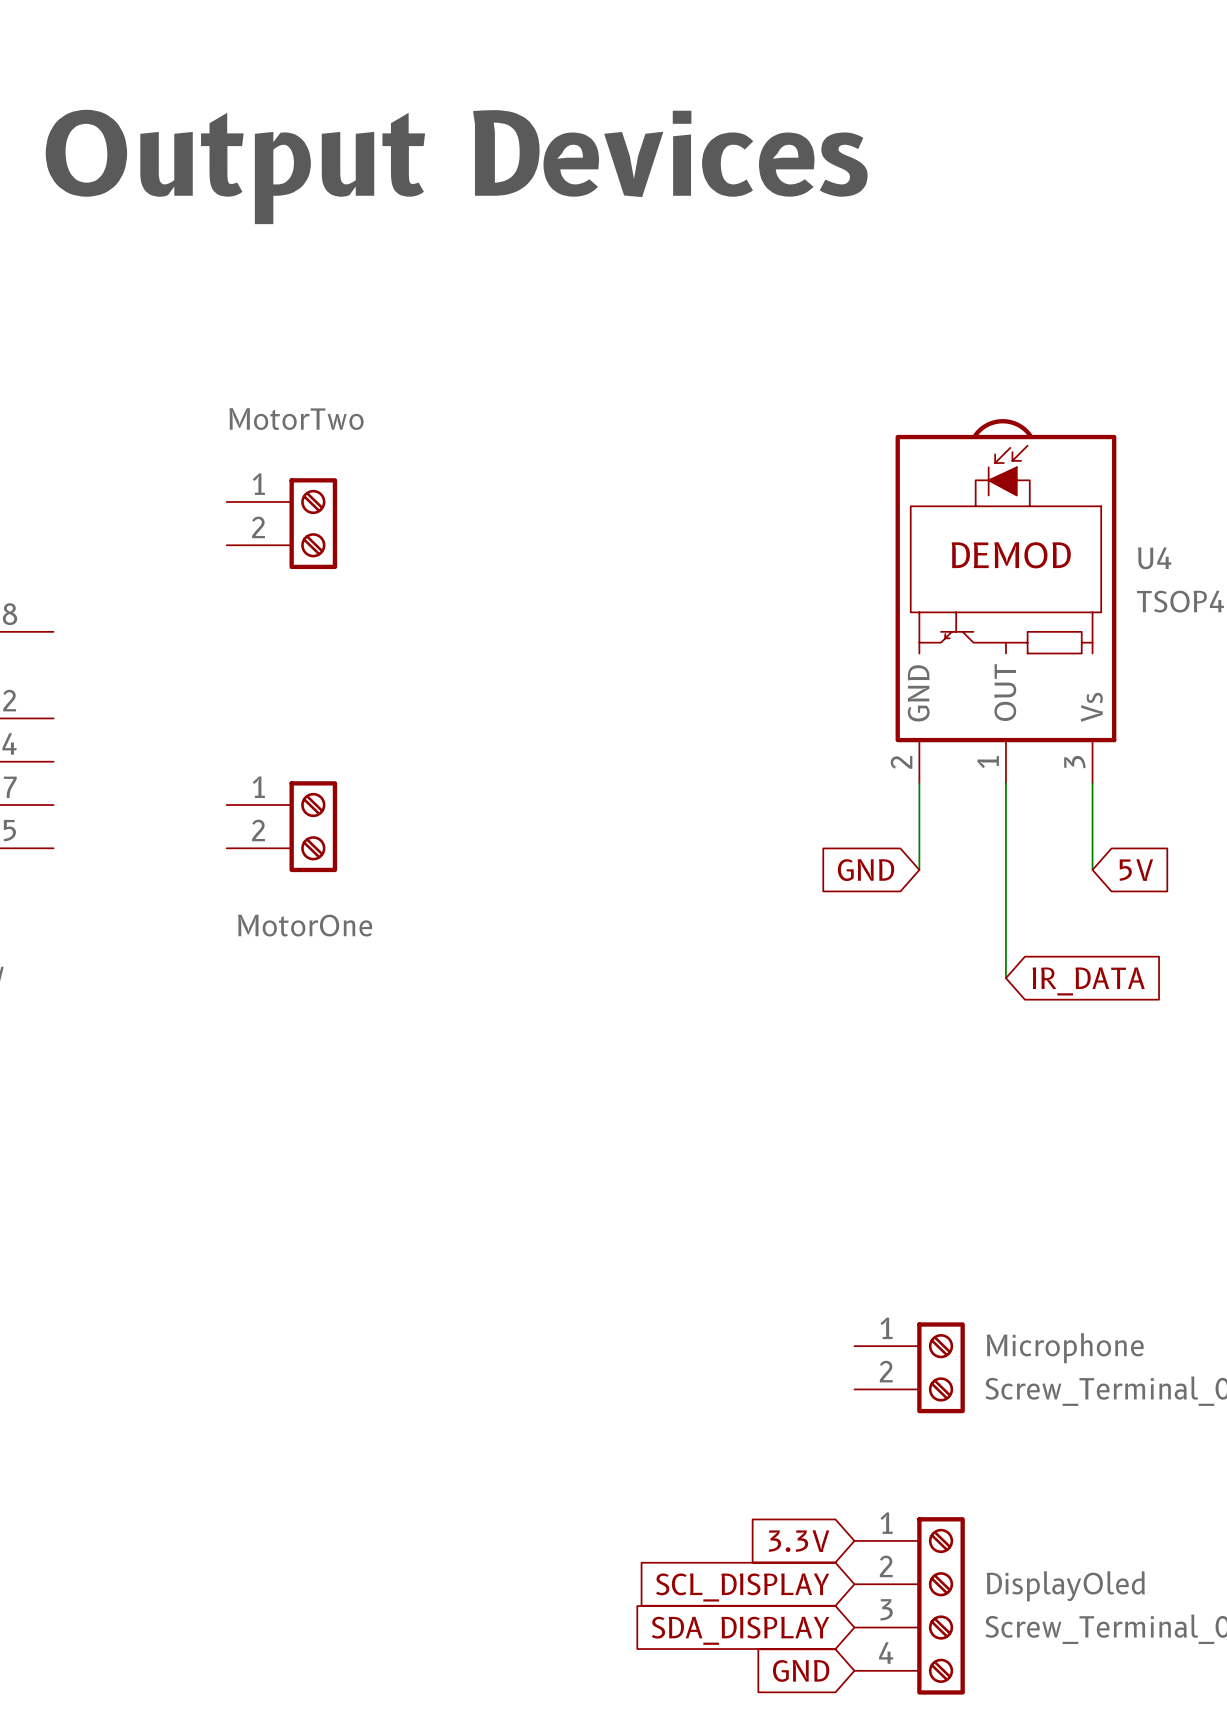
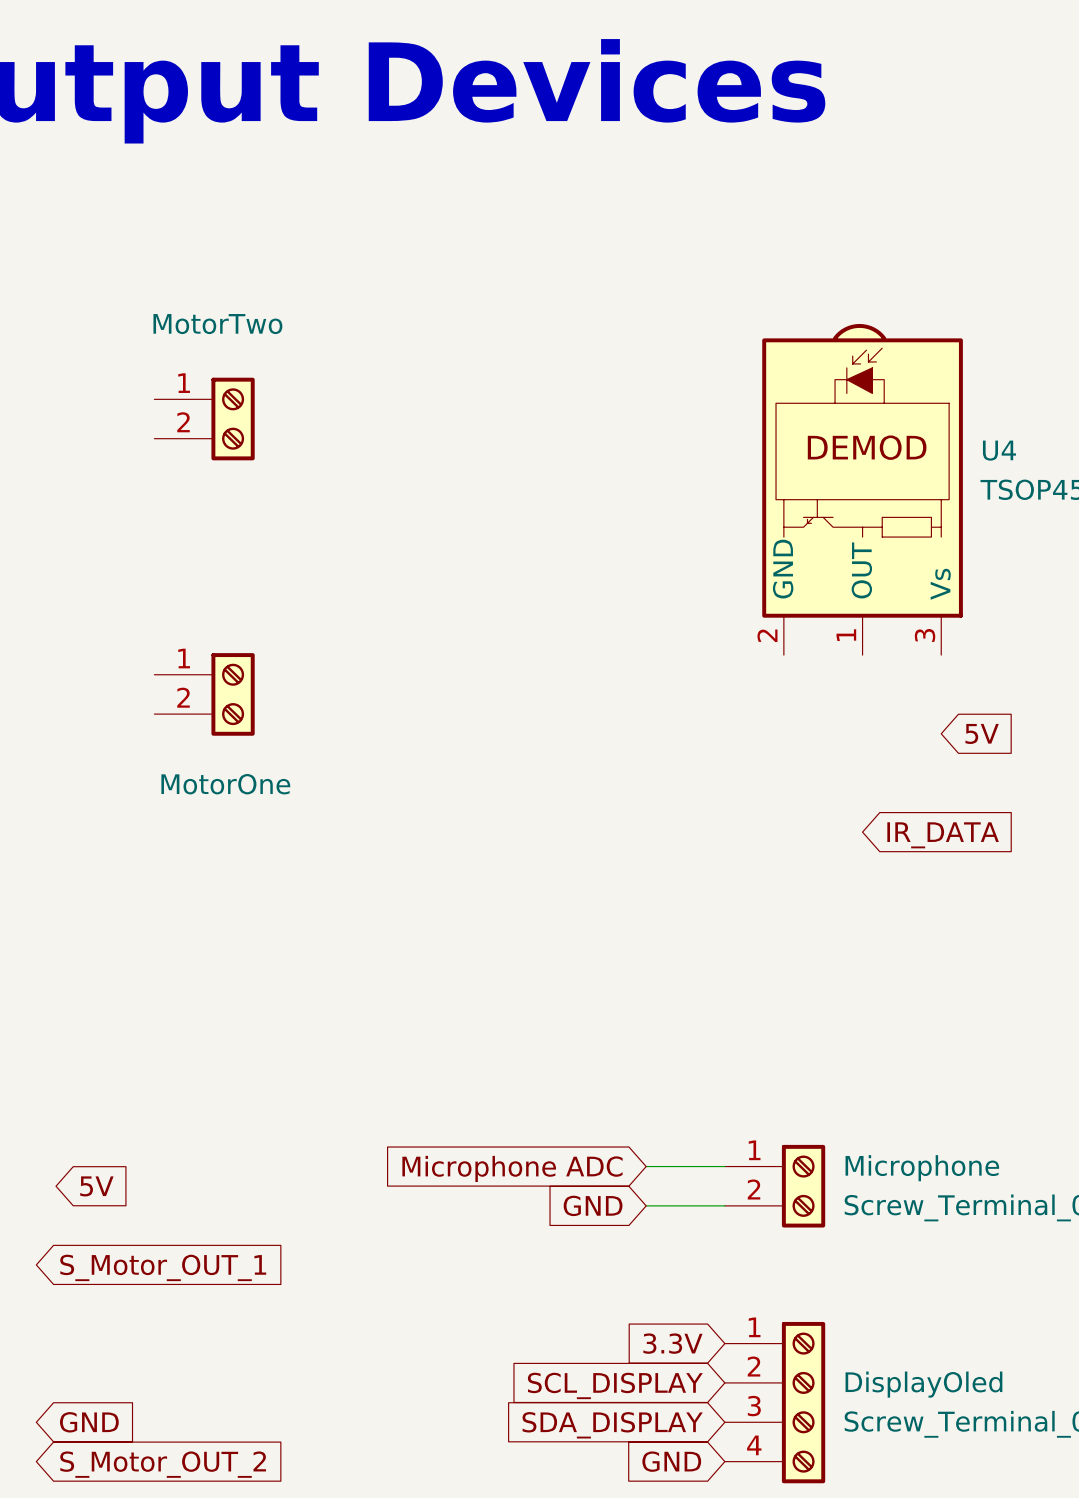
wire: (919, 783) (919, 869) -> none
wire: (1005, 783) (1005, 978) -> none
wire: (1092, 783) (1092, 869) -> none
global label: GND (866, 870) -> none
wire: none -> (646, 1166) (724, 1166)
global label: none -> Microphone ADC (512, 1168)
global label: none -> 5V (96, 1186)
global label: none -> GND (593, 1205)
wire: none -> (646, 1205) (724, 1205)
global label: none -> S_Motor_OUT_1 (163, 1267)
global label: none -> GND (89, 1422)
global label: none -> S_Motor_OUT_2 (163, 1464)

